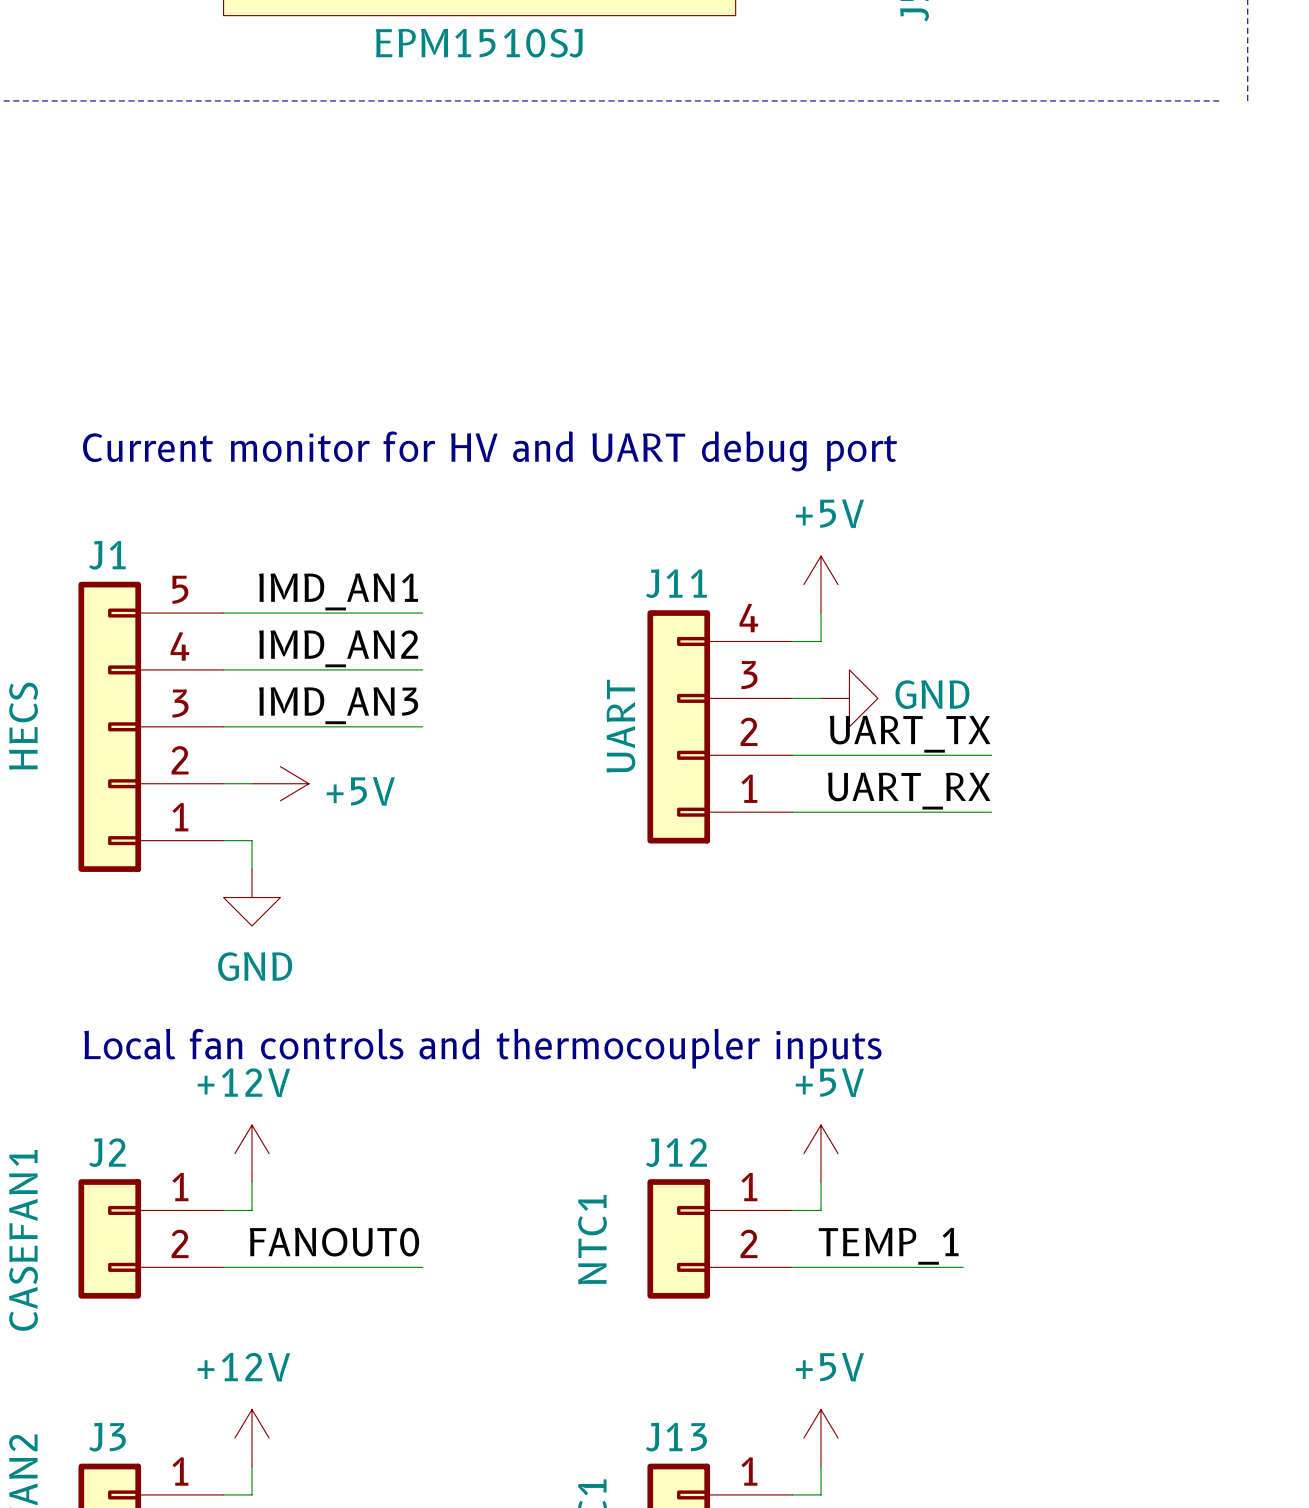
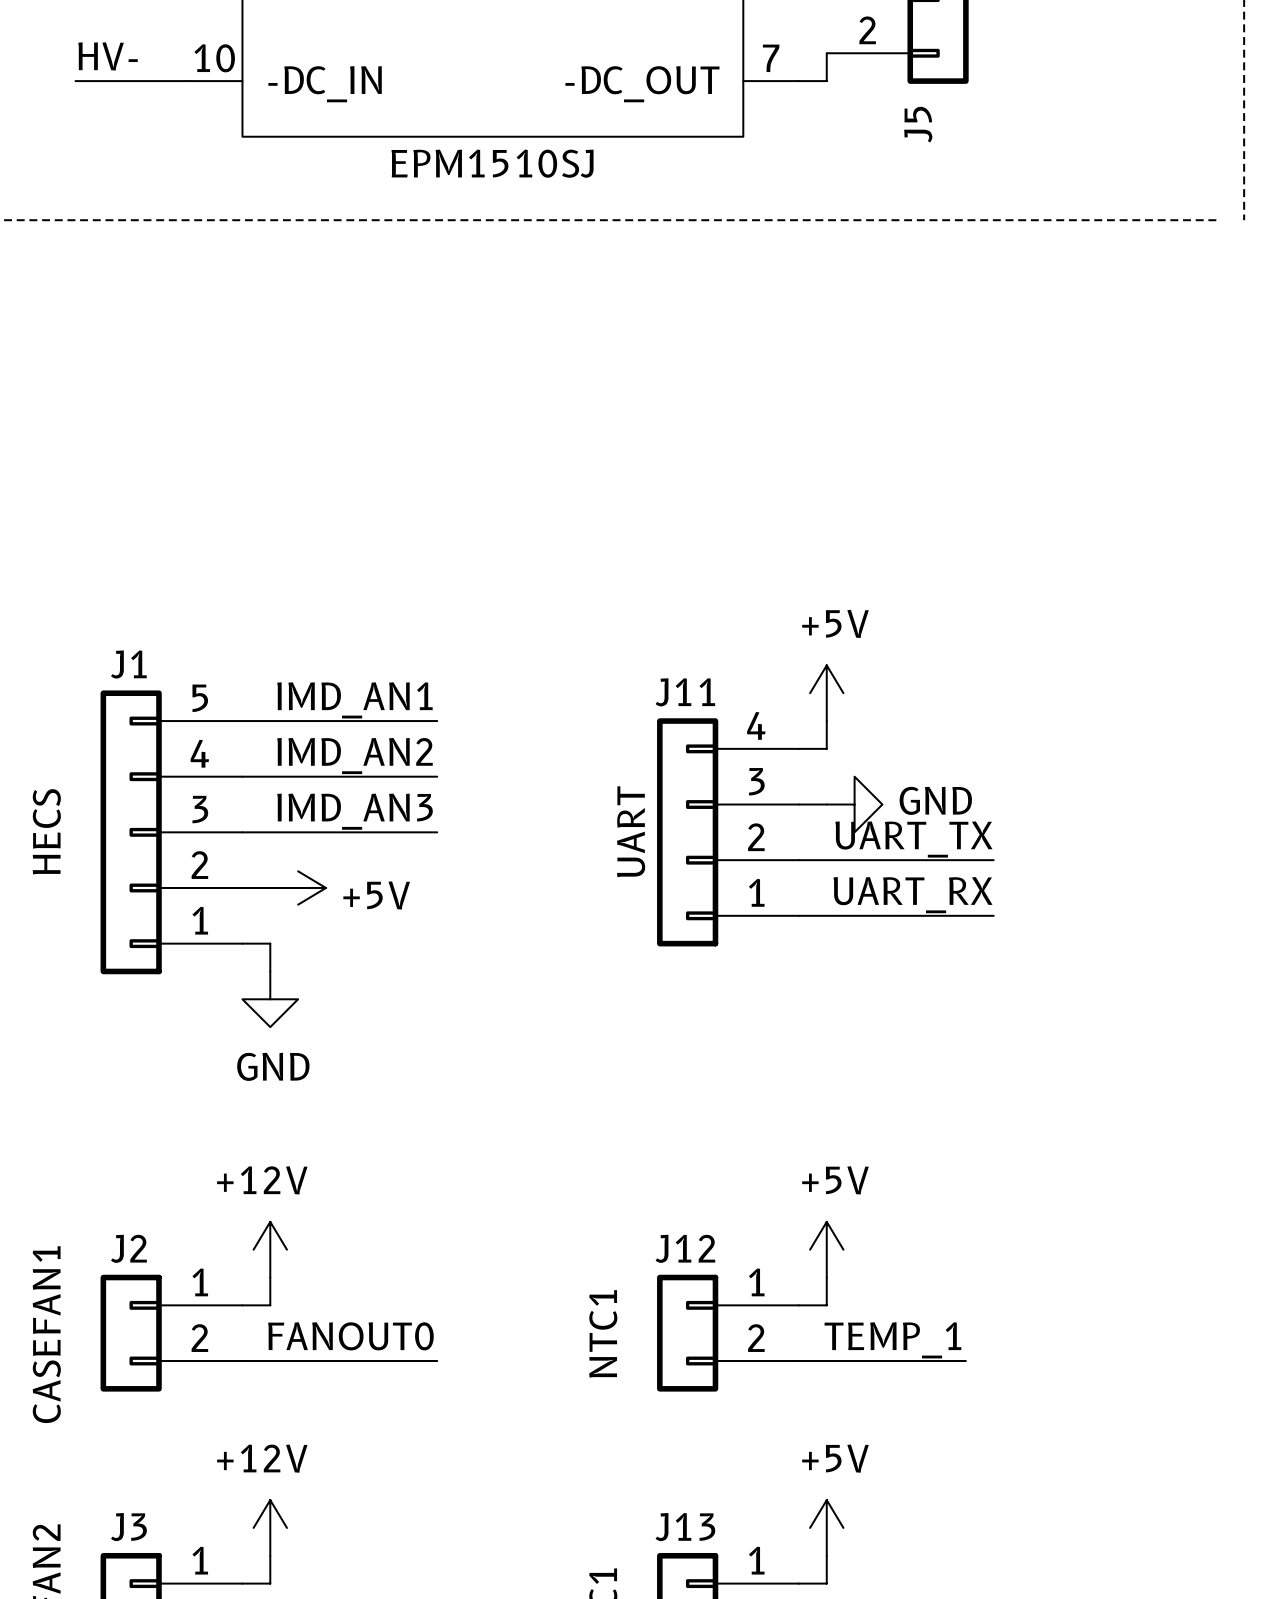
text: Current monitor for HV and UART debug port (489, 451) -> none
text: Local fan controls and thermocoupler inputs (482, 1048) -> none

